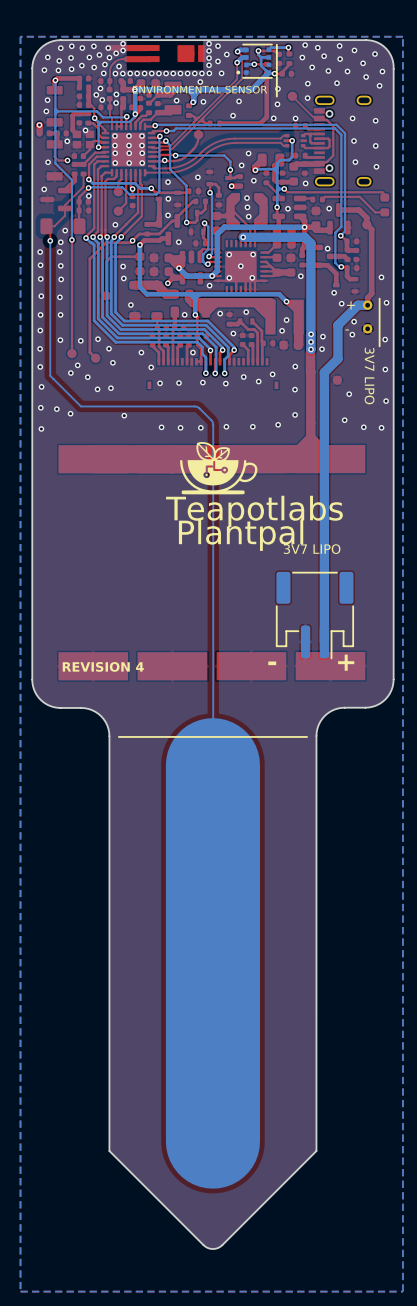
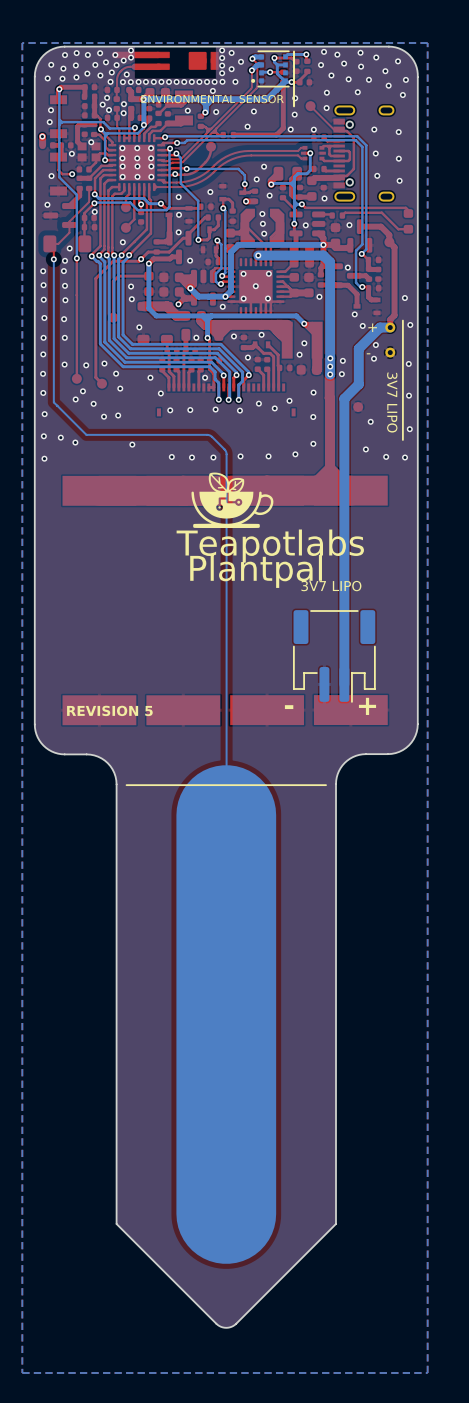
line: none -> (402, 371) (402, 439)
text: REVISION 4 (103, 666) -> REVISION 5 (109, 710)

